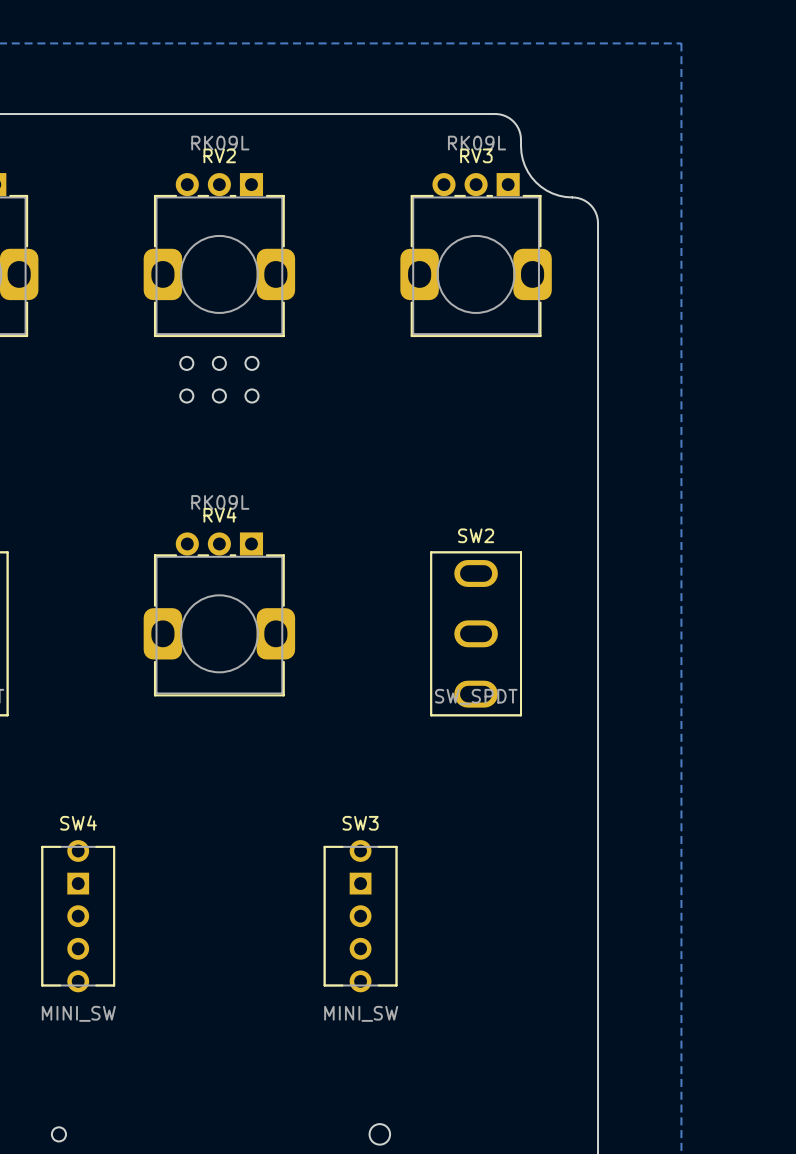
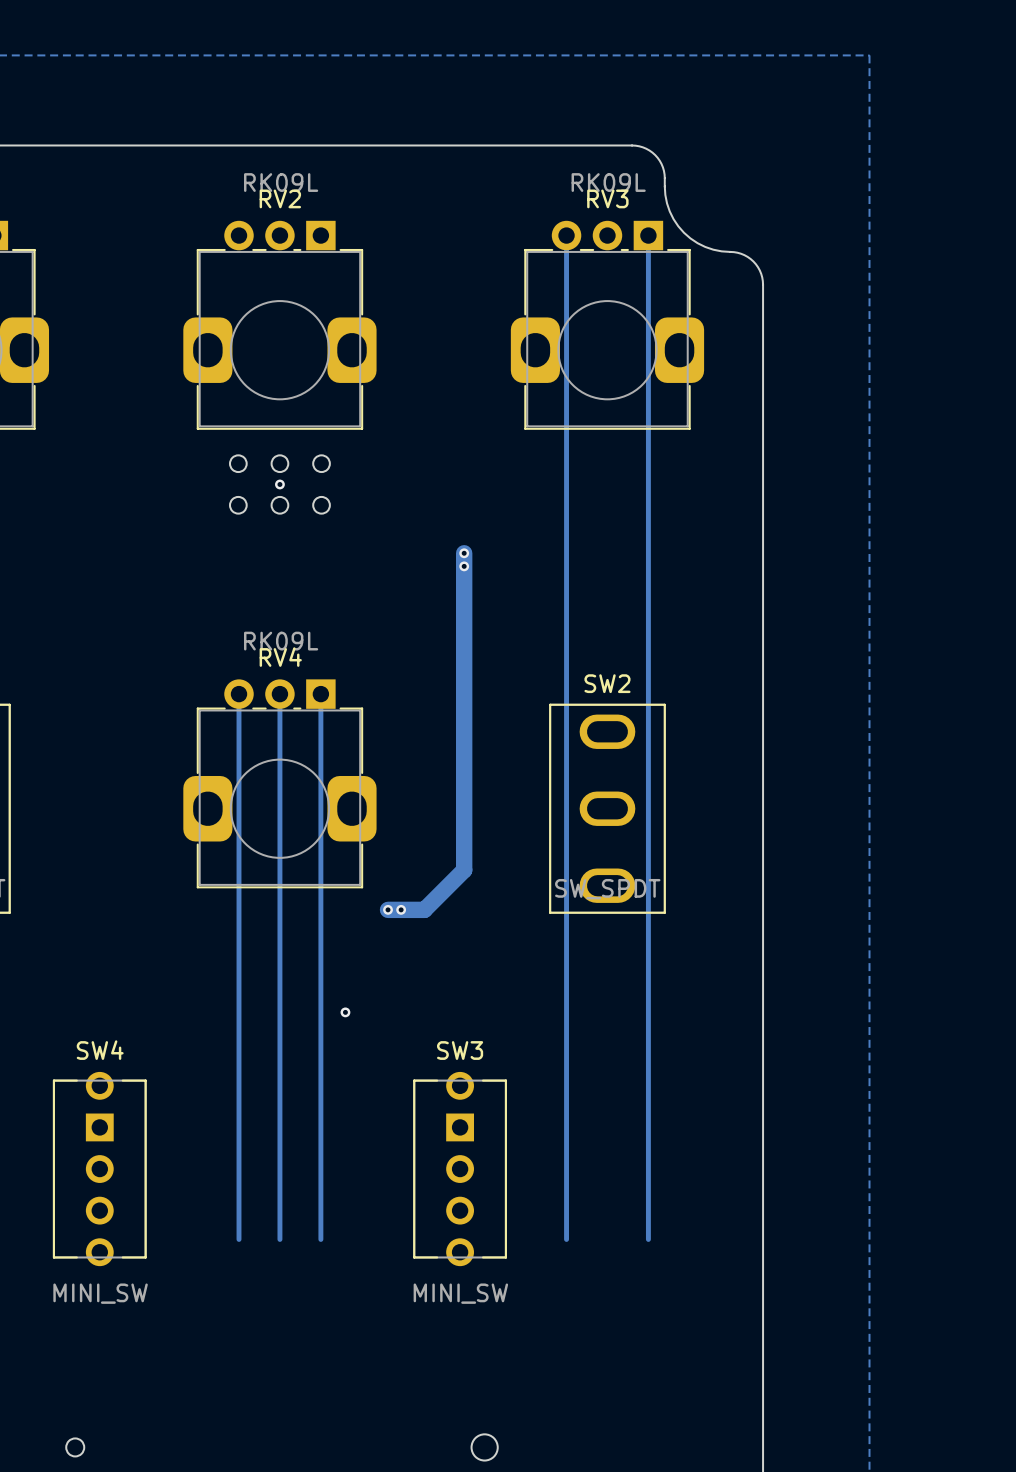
track: none -> (566, 235) (566, 1239)
track: none -> (648, 235) (648, 1239)
via: none -> (279, 484)
track: none -> (464, 553) (464, 870) (424, 909) (388, 909)
via: none -> (464, 553)
via: none -> (464, 566)
track: none -> (239, 694) (239, 1239)
track: none -> (279, 694) (279, 1239)
track: none -> (320, 694) (320, 1239)
via: none -> (388, 909)
via: none -> (401, 909)
via: none -> (345, 1012)

